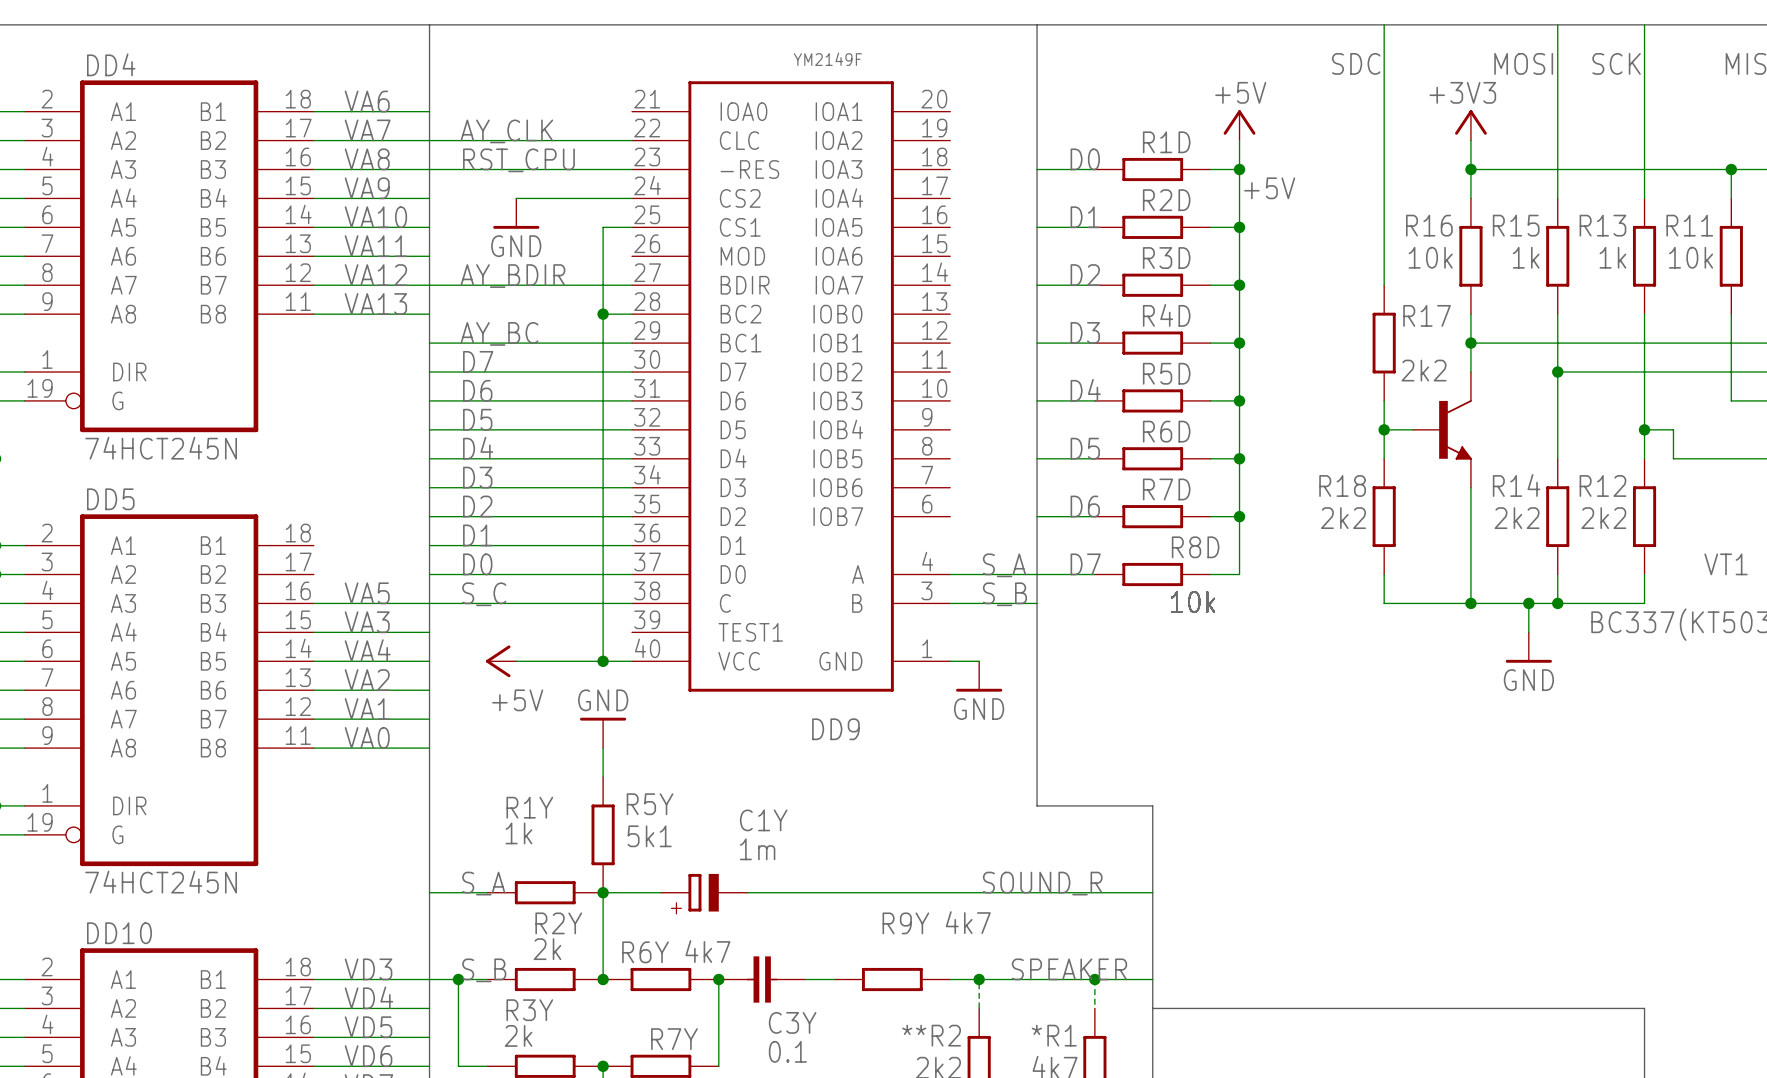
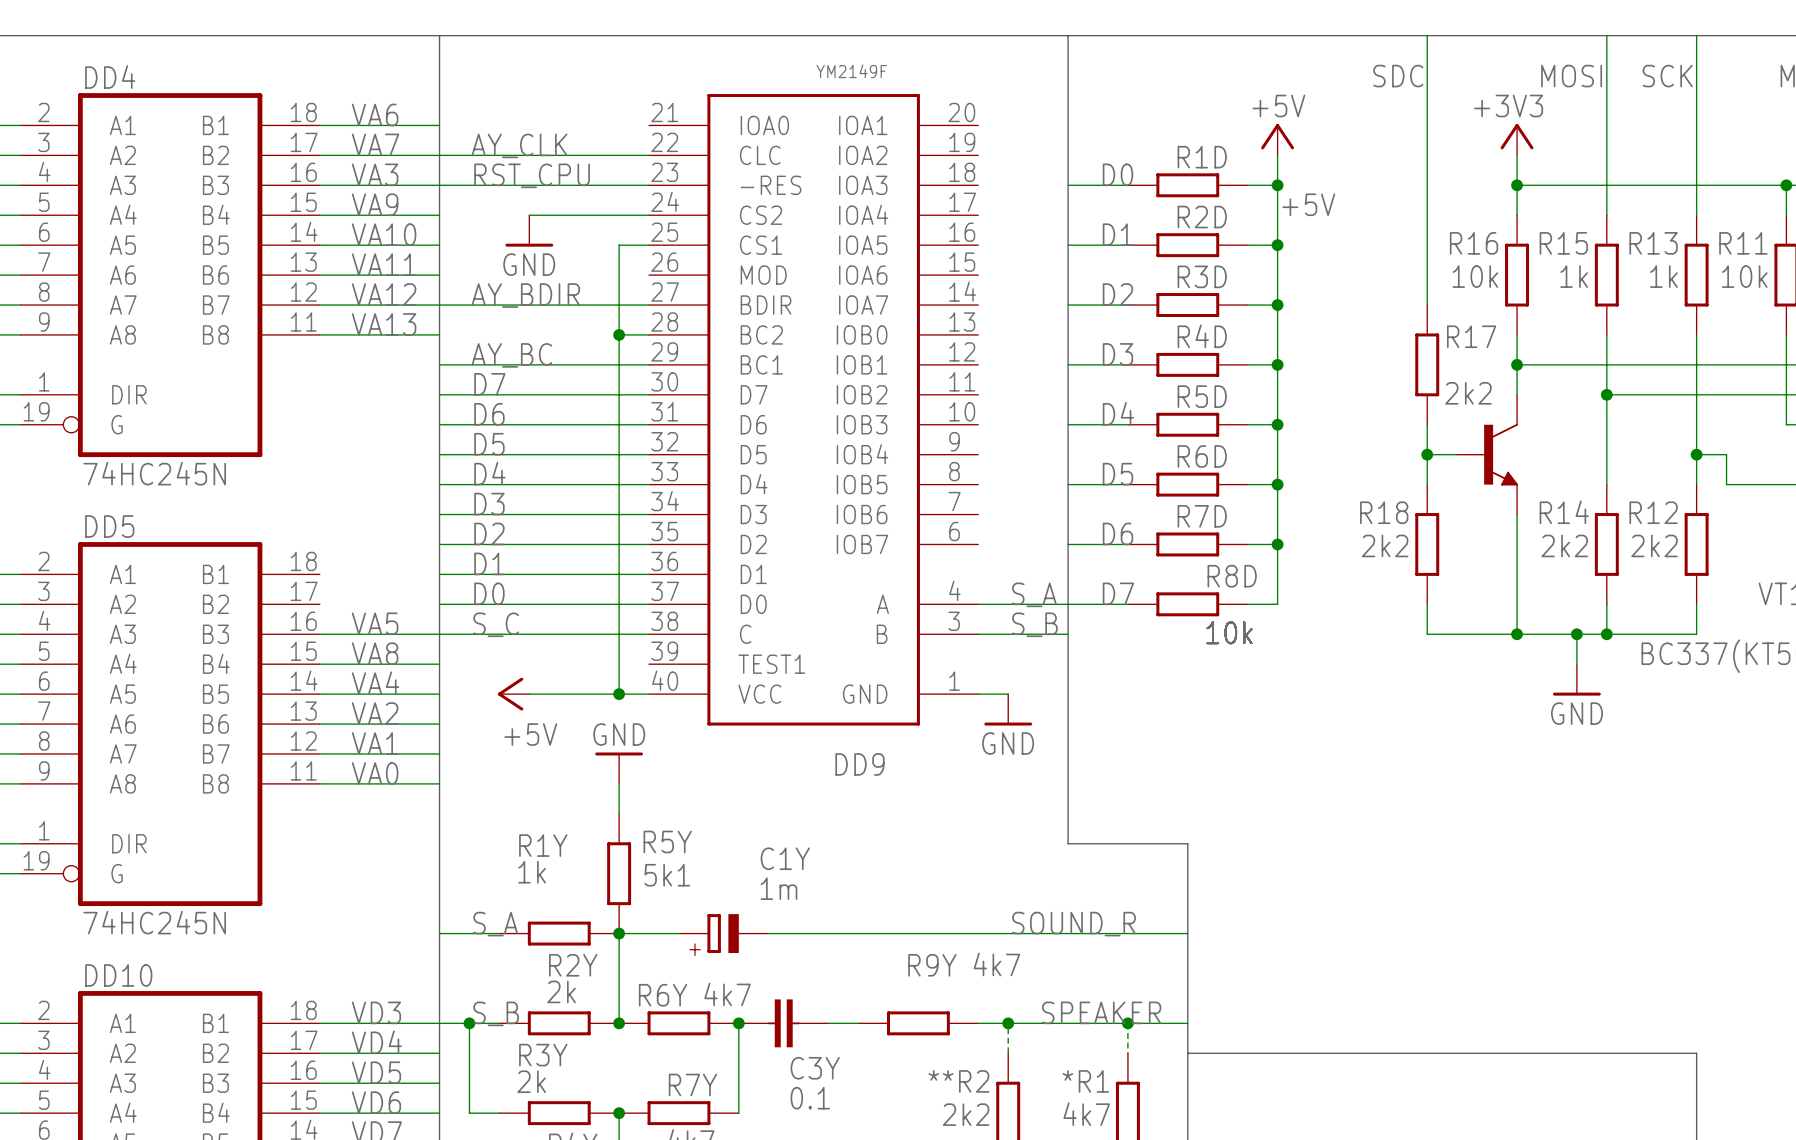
label: VA8 (367, 159) -> VA3 (375, 174)
DD4 value: 74HCT245N (161, 448) -> 74HC245N (154, 473)
label: VA3 (367, 622) -> VA8 (375, 653)
DD5 value: 74HCT245N (161, 882) -> 74HC245N (154, 922)

